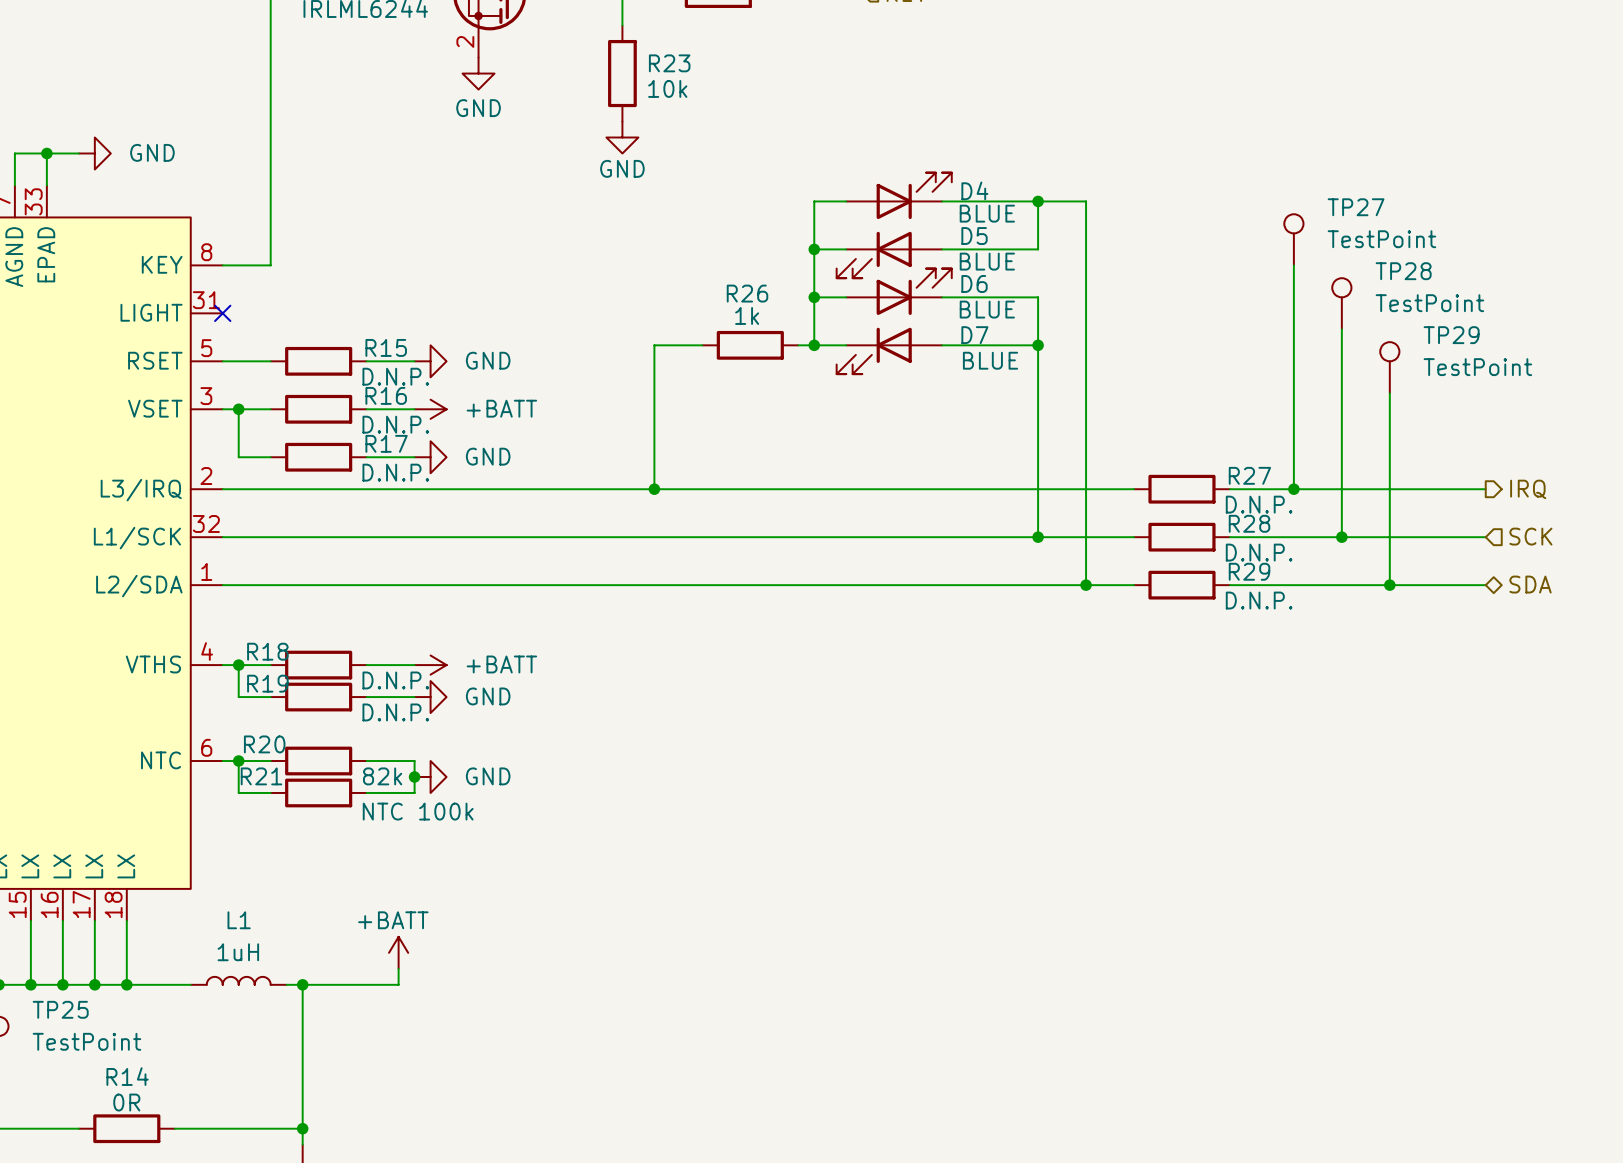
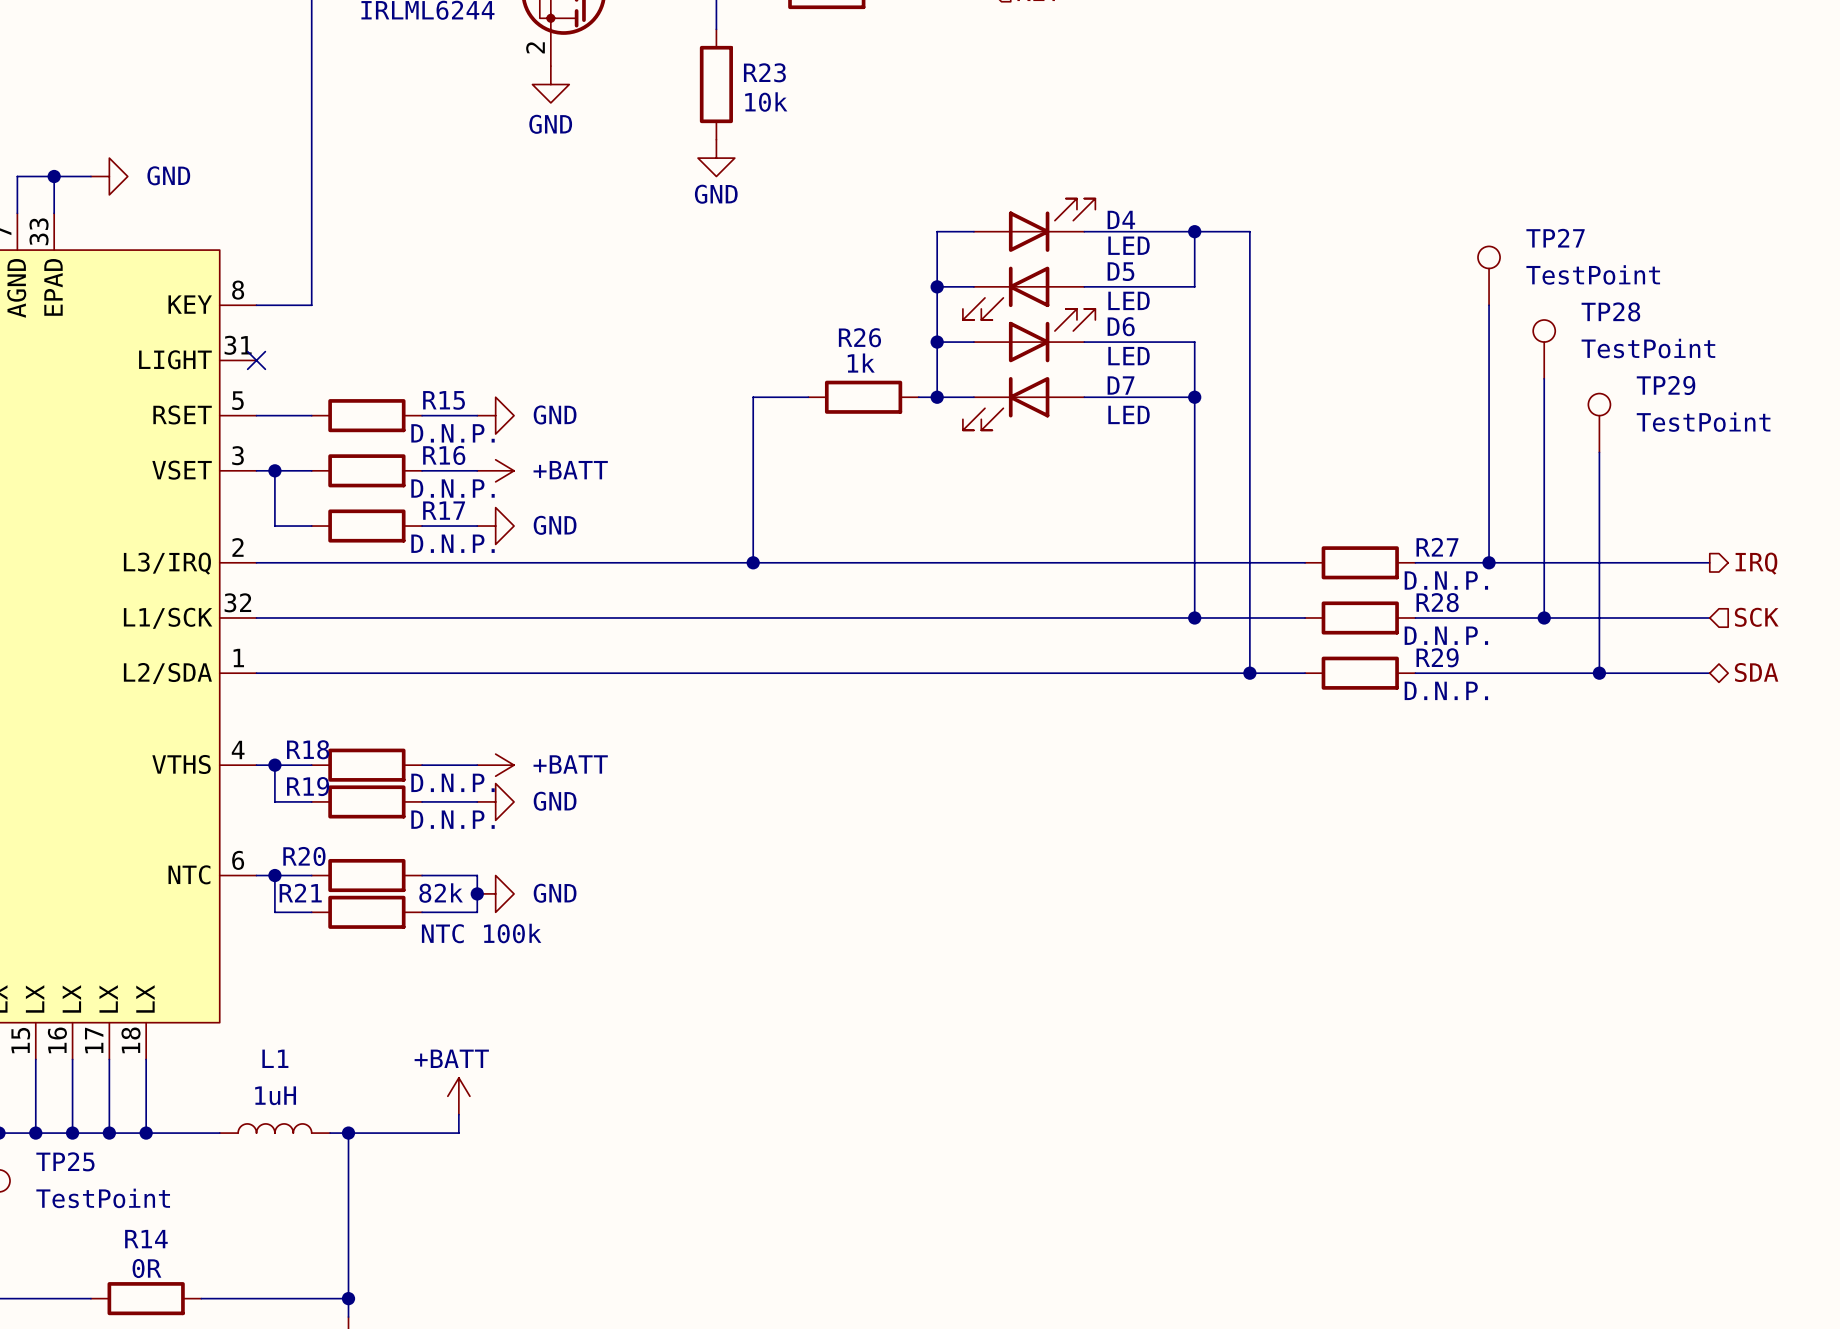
D4 value: BLUE (987, 213) -> LED (1129, 245)
D5 value: BLUE (987, 261) -> LED (1129, 300)
D6 value: BLUE (987, 309) -> LED (1129, 356)
D7 value: BLUE (990, 360) -> LED (1129, 414)

